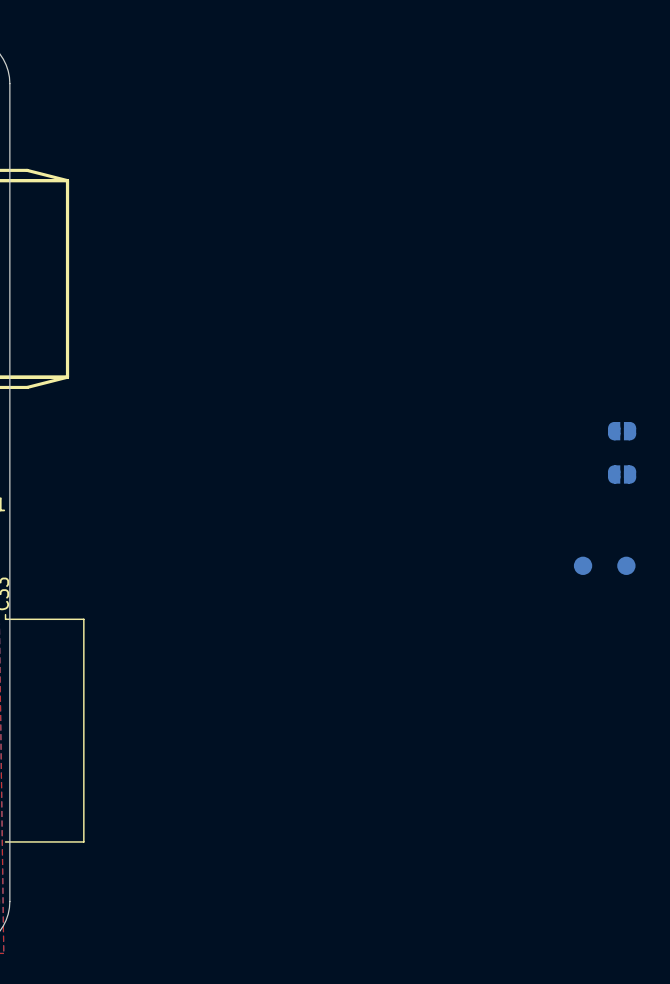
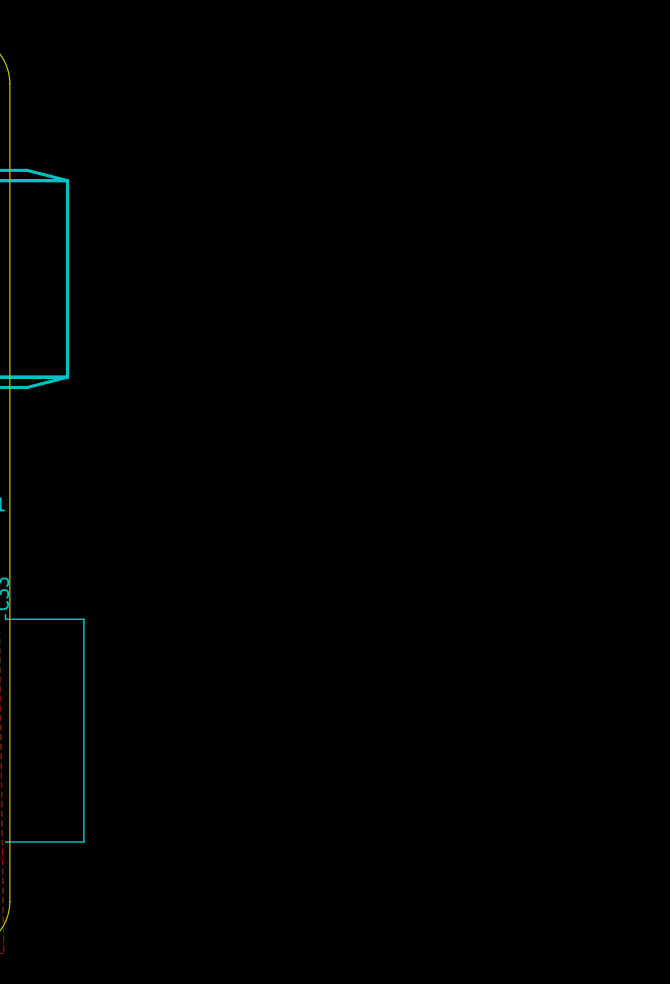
part: (622, 431) -> none
part: (622, 474) -> none
part: (583, 565) -> none
part: (626, 565) -> none

